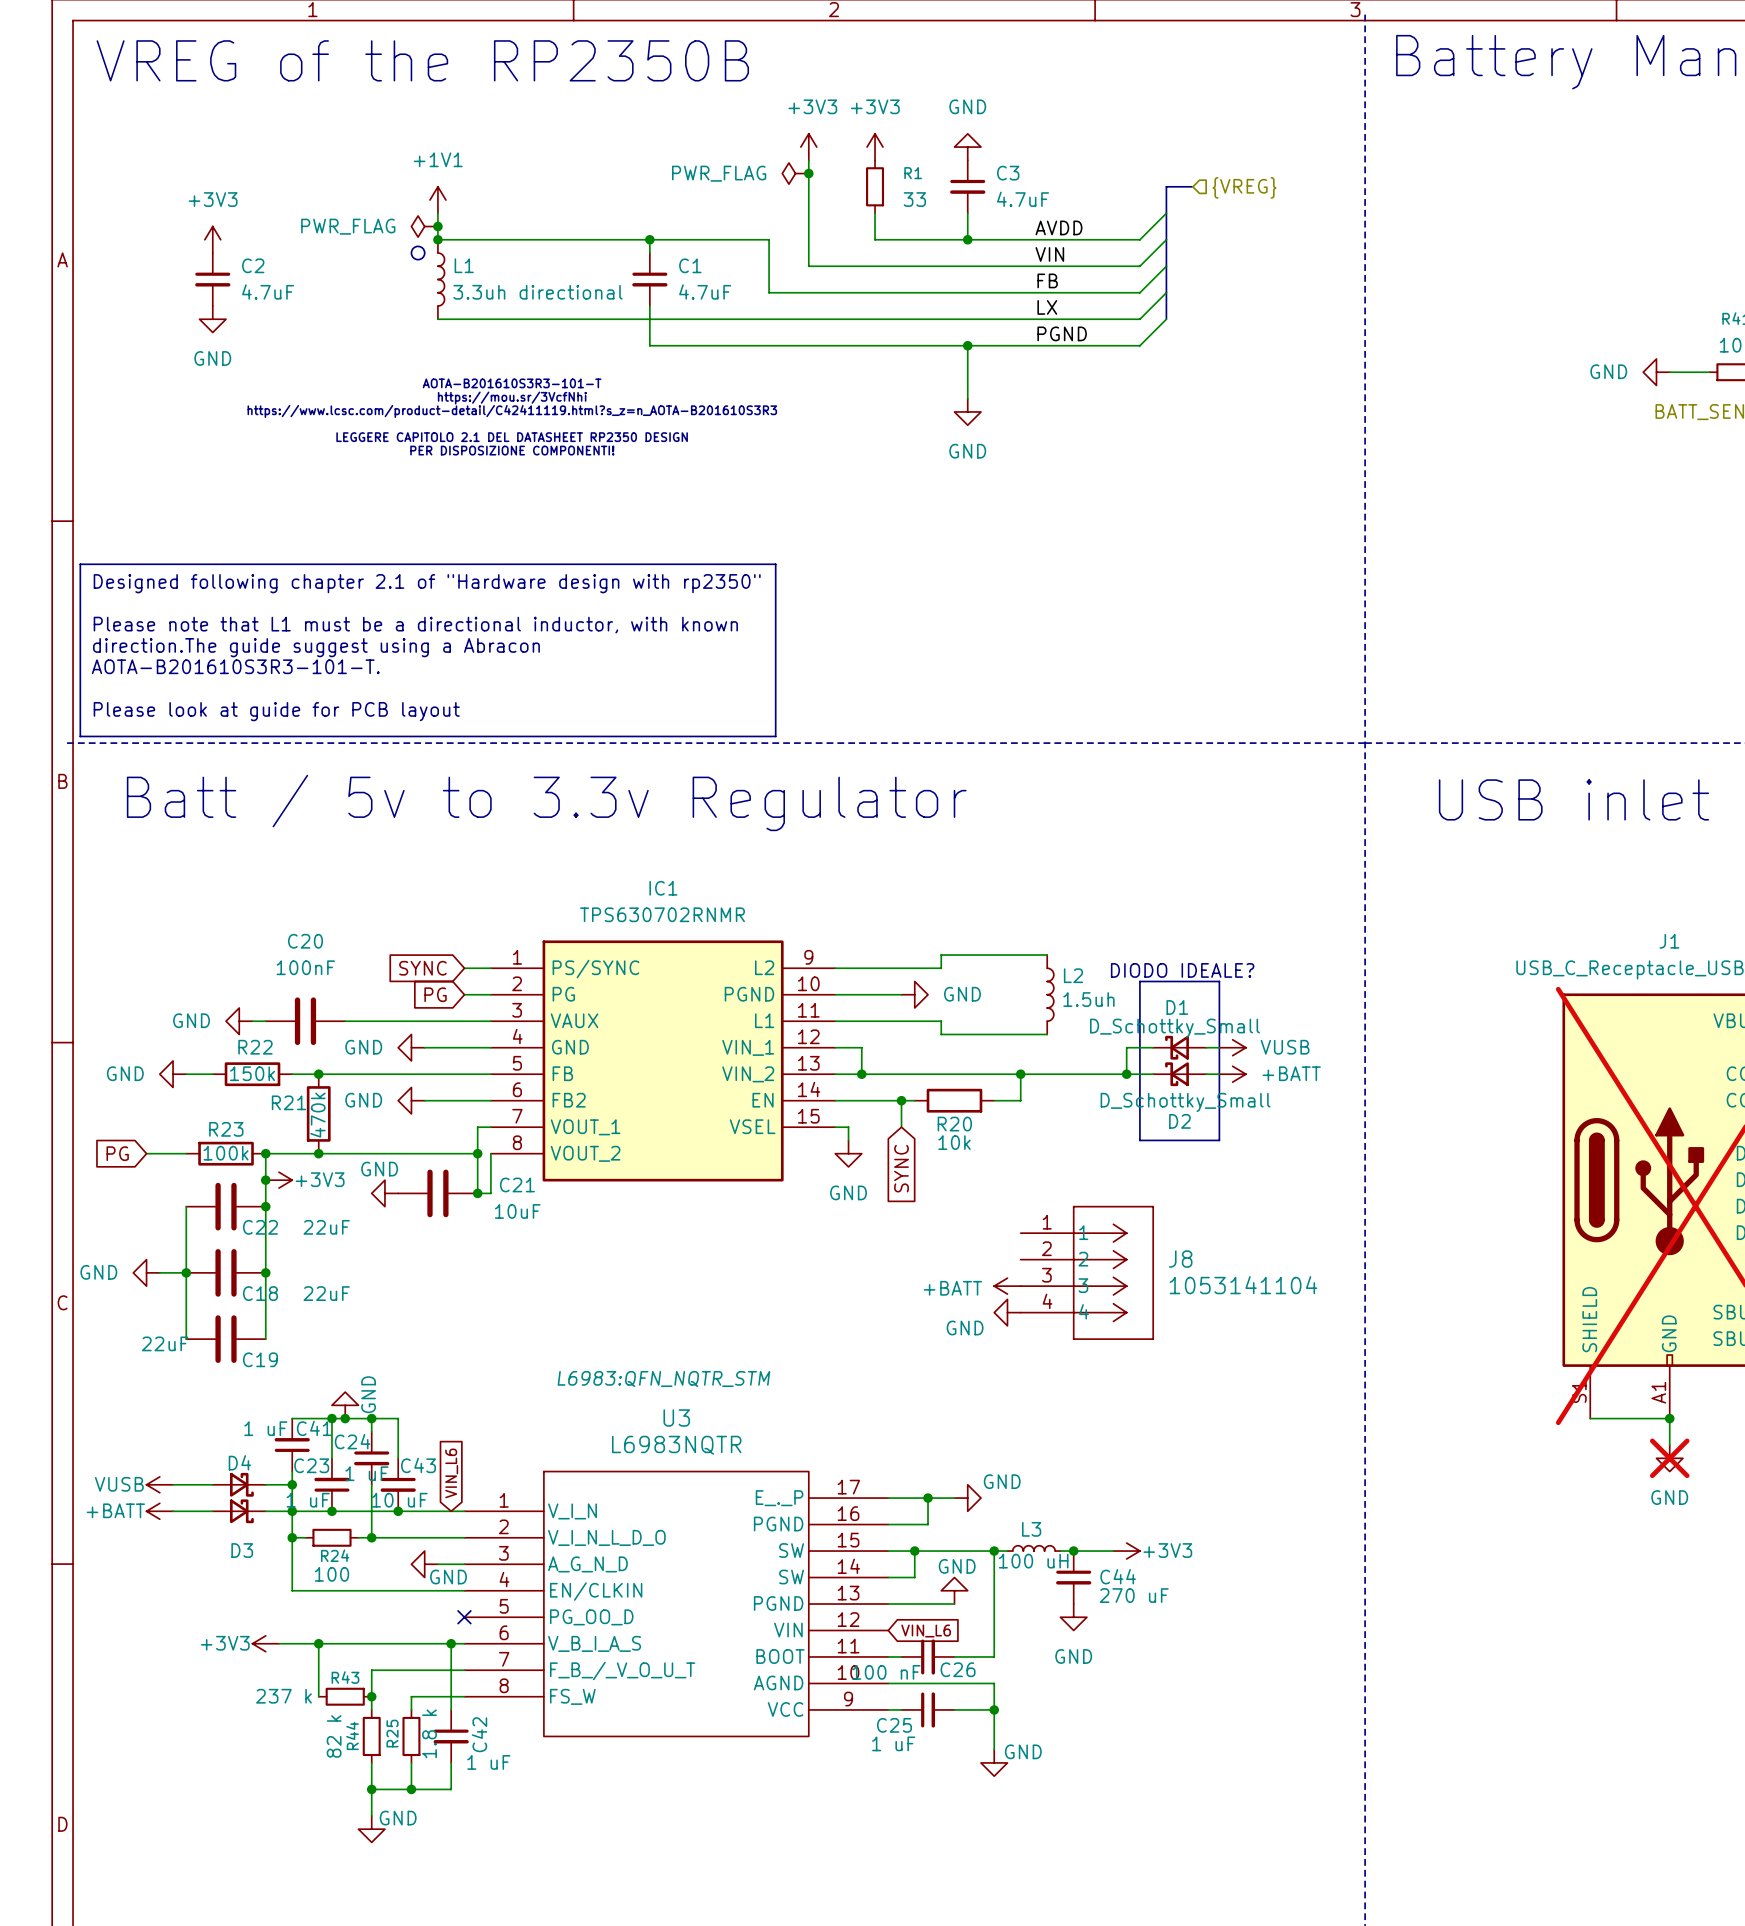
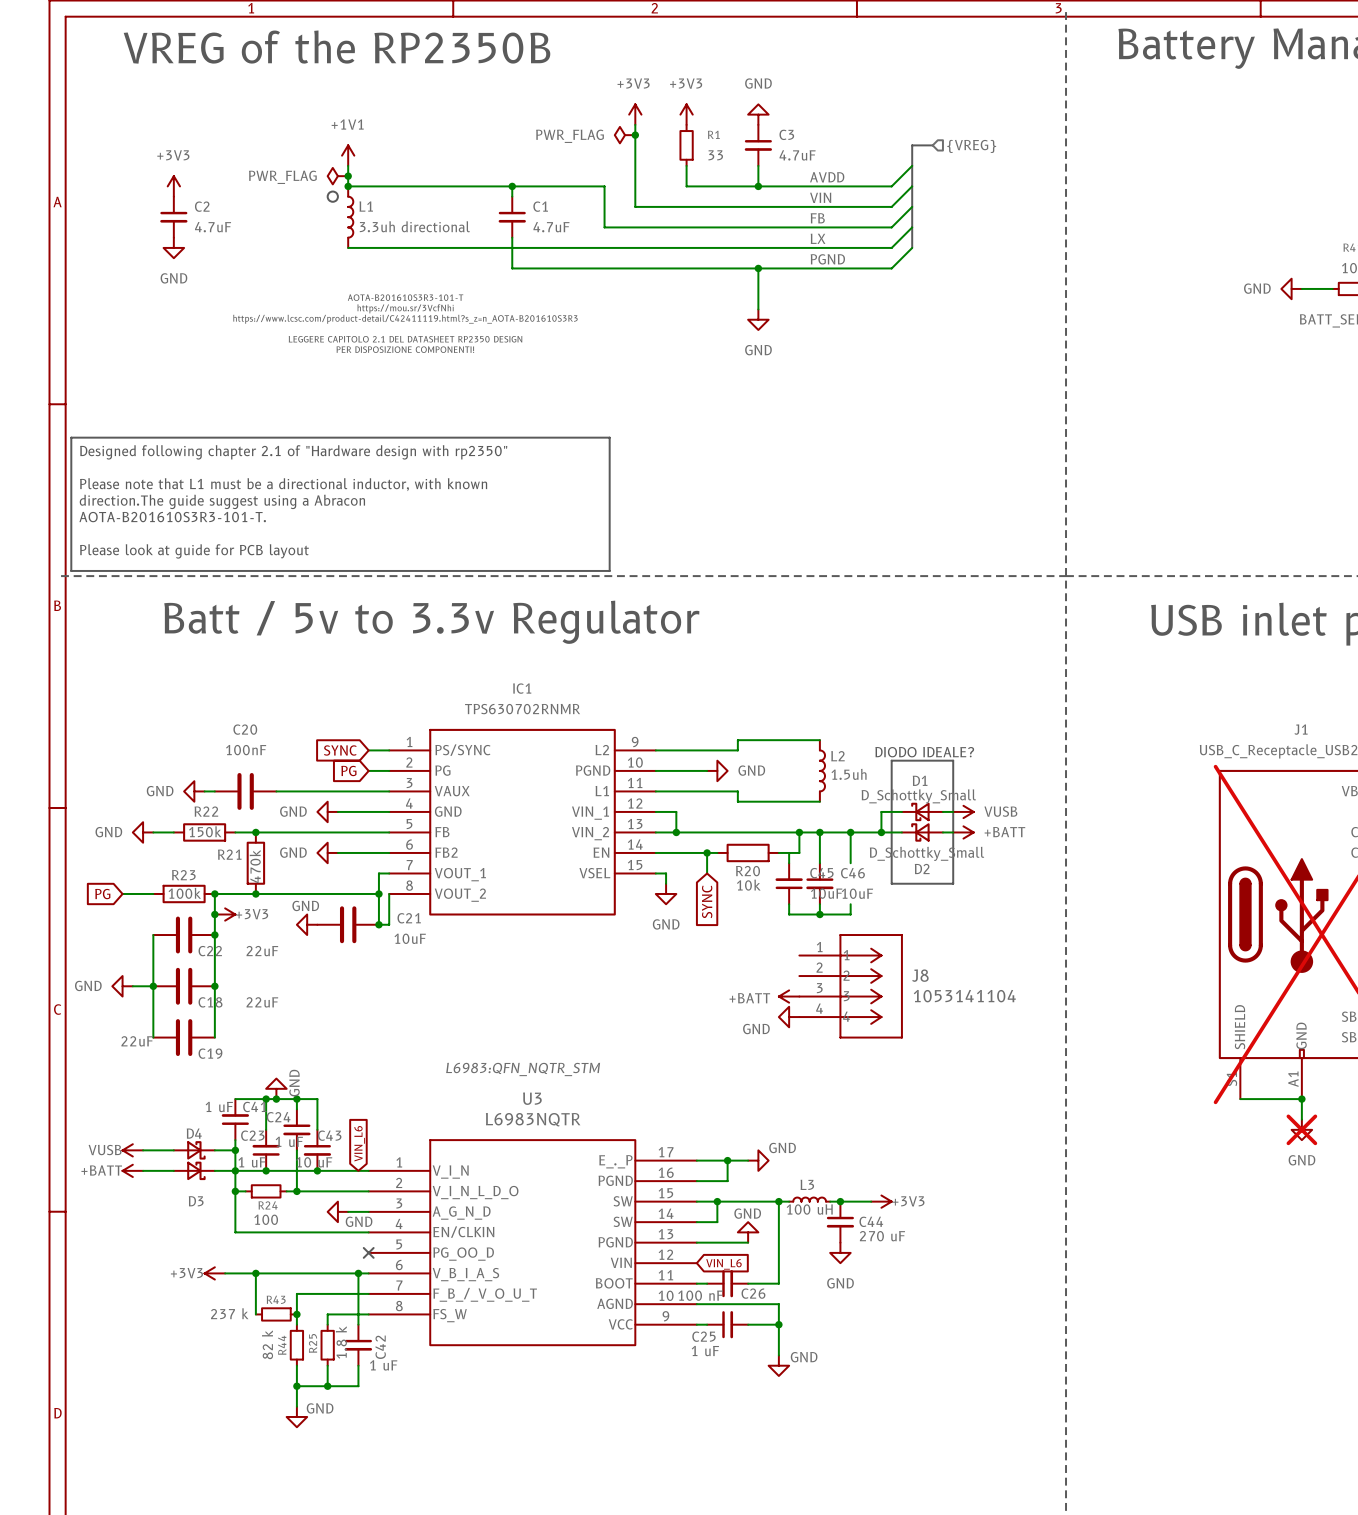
wire: none -> (819, 832) (819, 863)
junction: none -> (819, 832)
wire: none -> (850, 832) (850, 863)
junction: none -> (850, 832)
wire: none -> (789, 852) (789, 863)
C45: none -> 10uF (789, 883)
C46: none -> 10uF (819, 883)
wire: none -> (789, 904) (789, 914) (850, 914) (850, 904)
wire: none -> (819, 904) (819, 914)
junction: none -> (819, 914)

